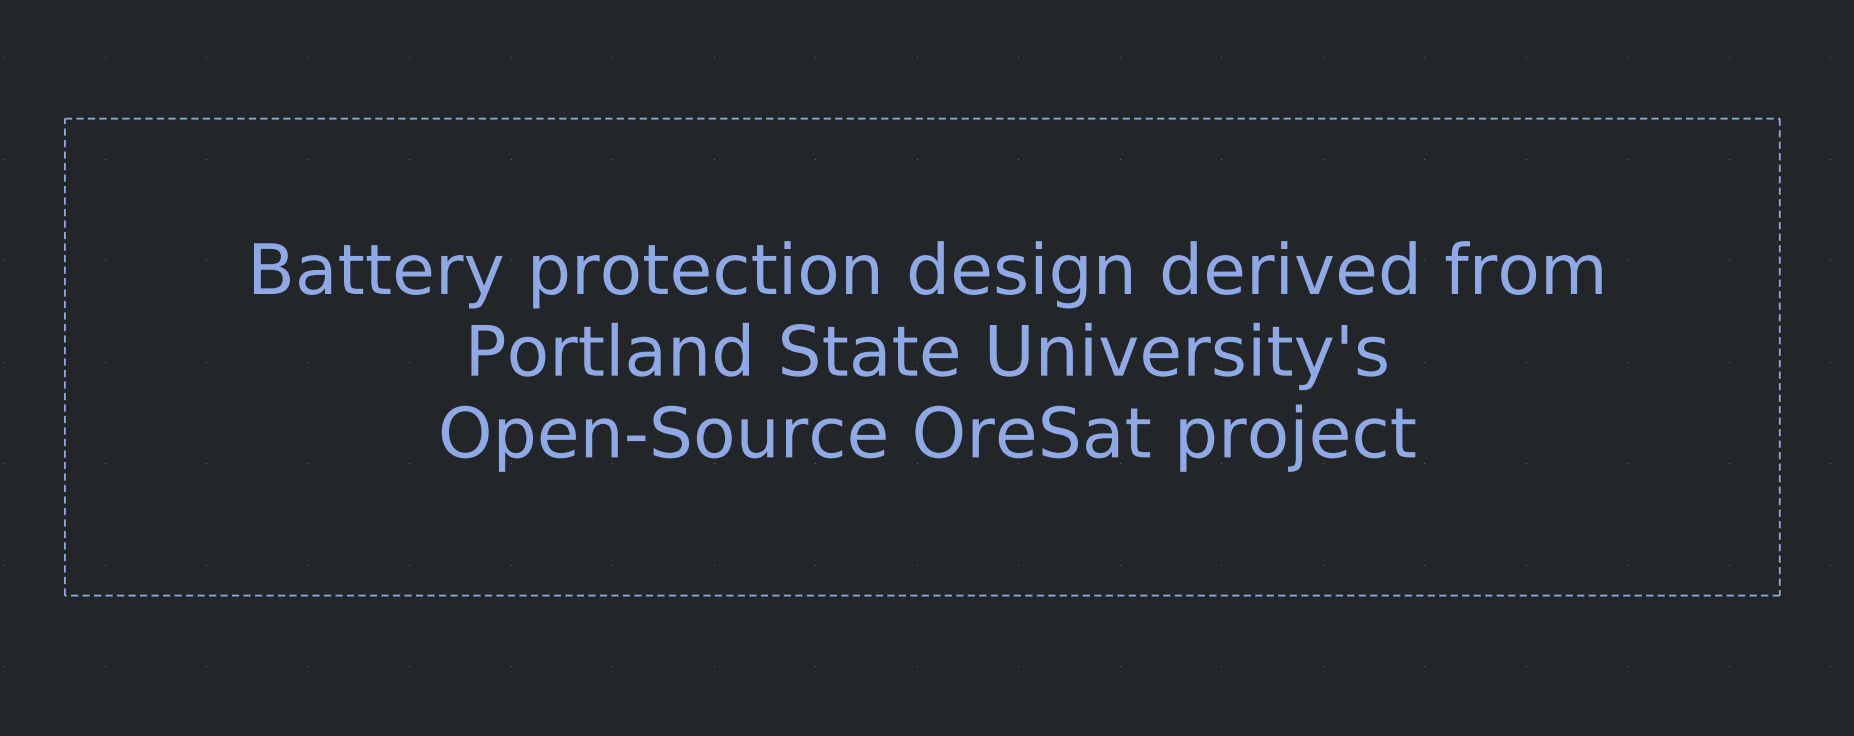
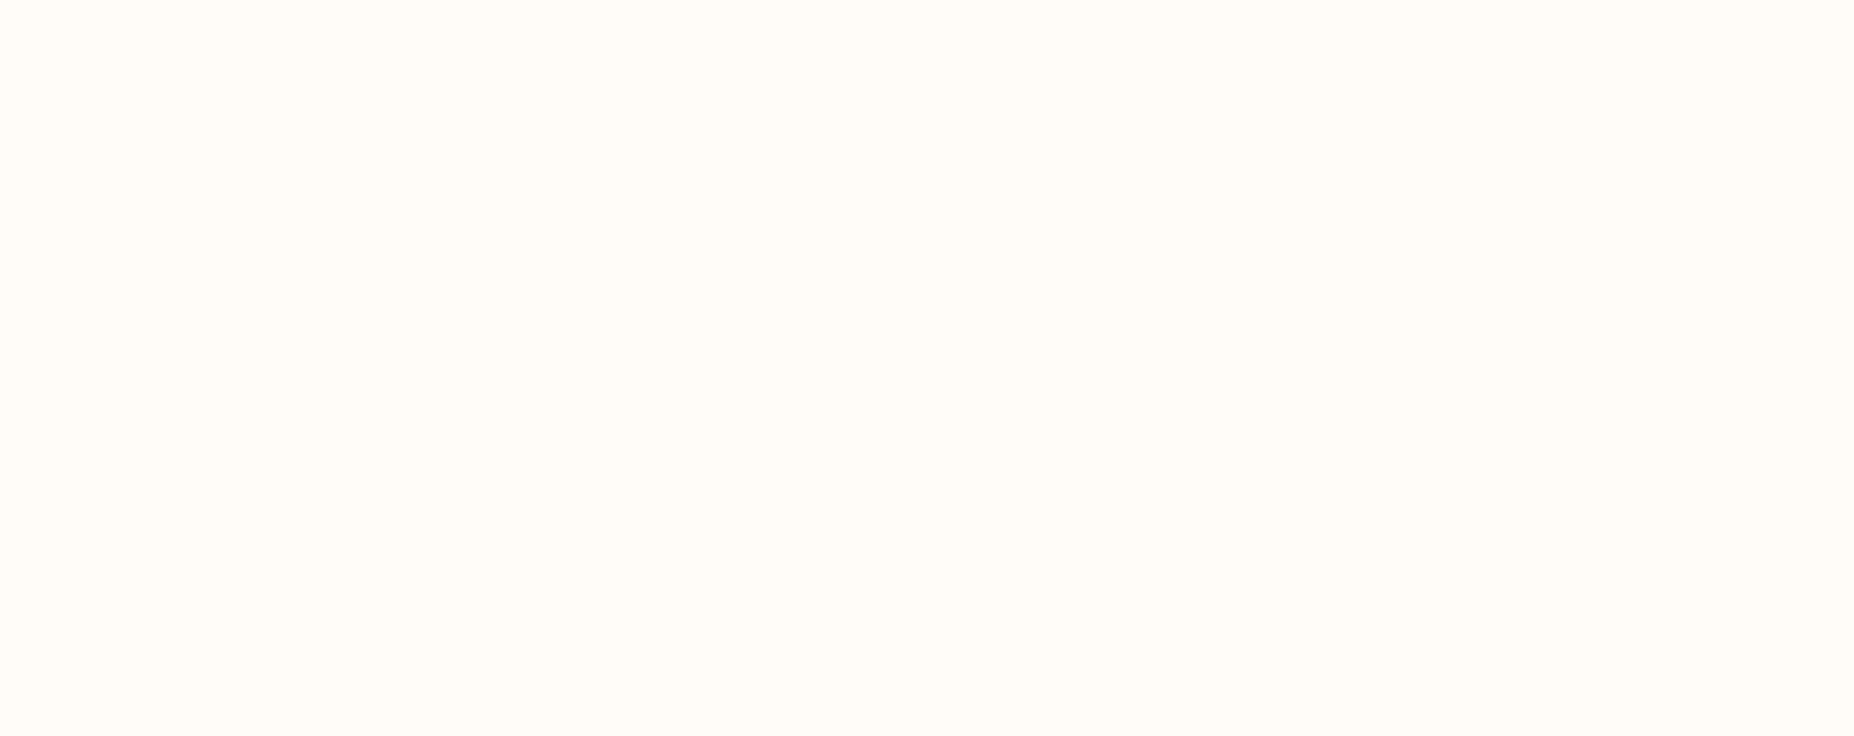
line: (64, 118) (1779, 118) (1779, 595) (64, 595) (64, 118) -> none
text: Battery protection design derived from (927, 274) -> none
text: Portland State University's (929, 356) -> none
text: Open-Source OreSat project (928, 438) -> none

